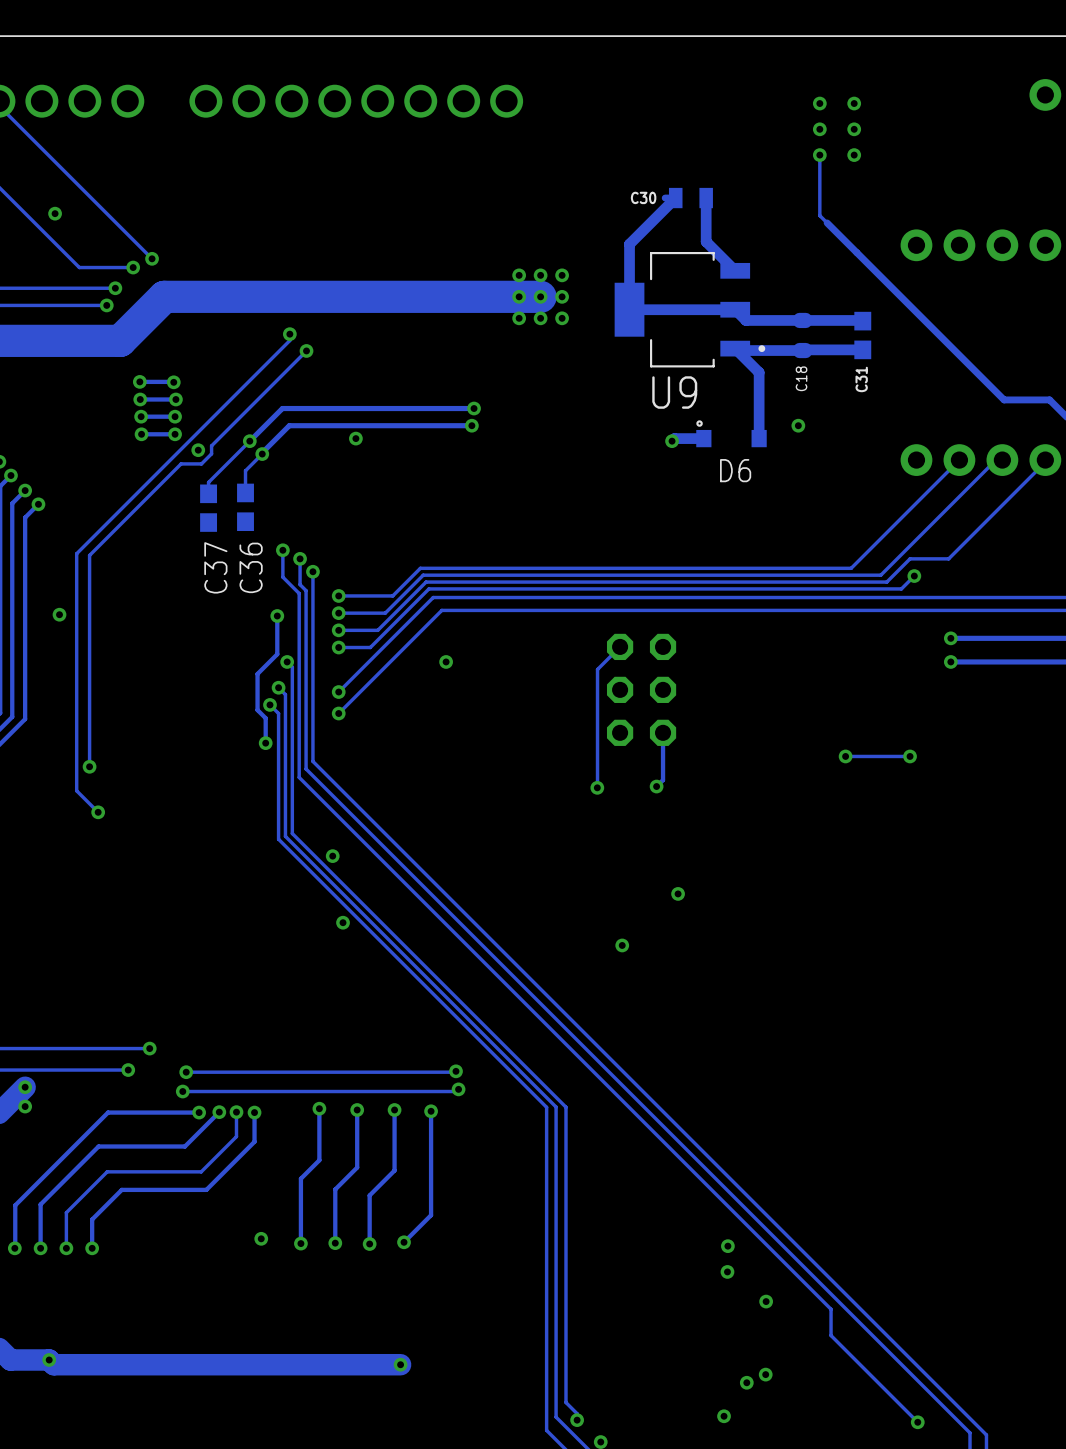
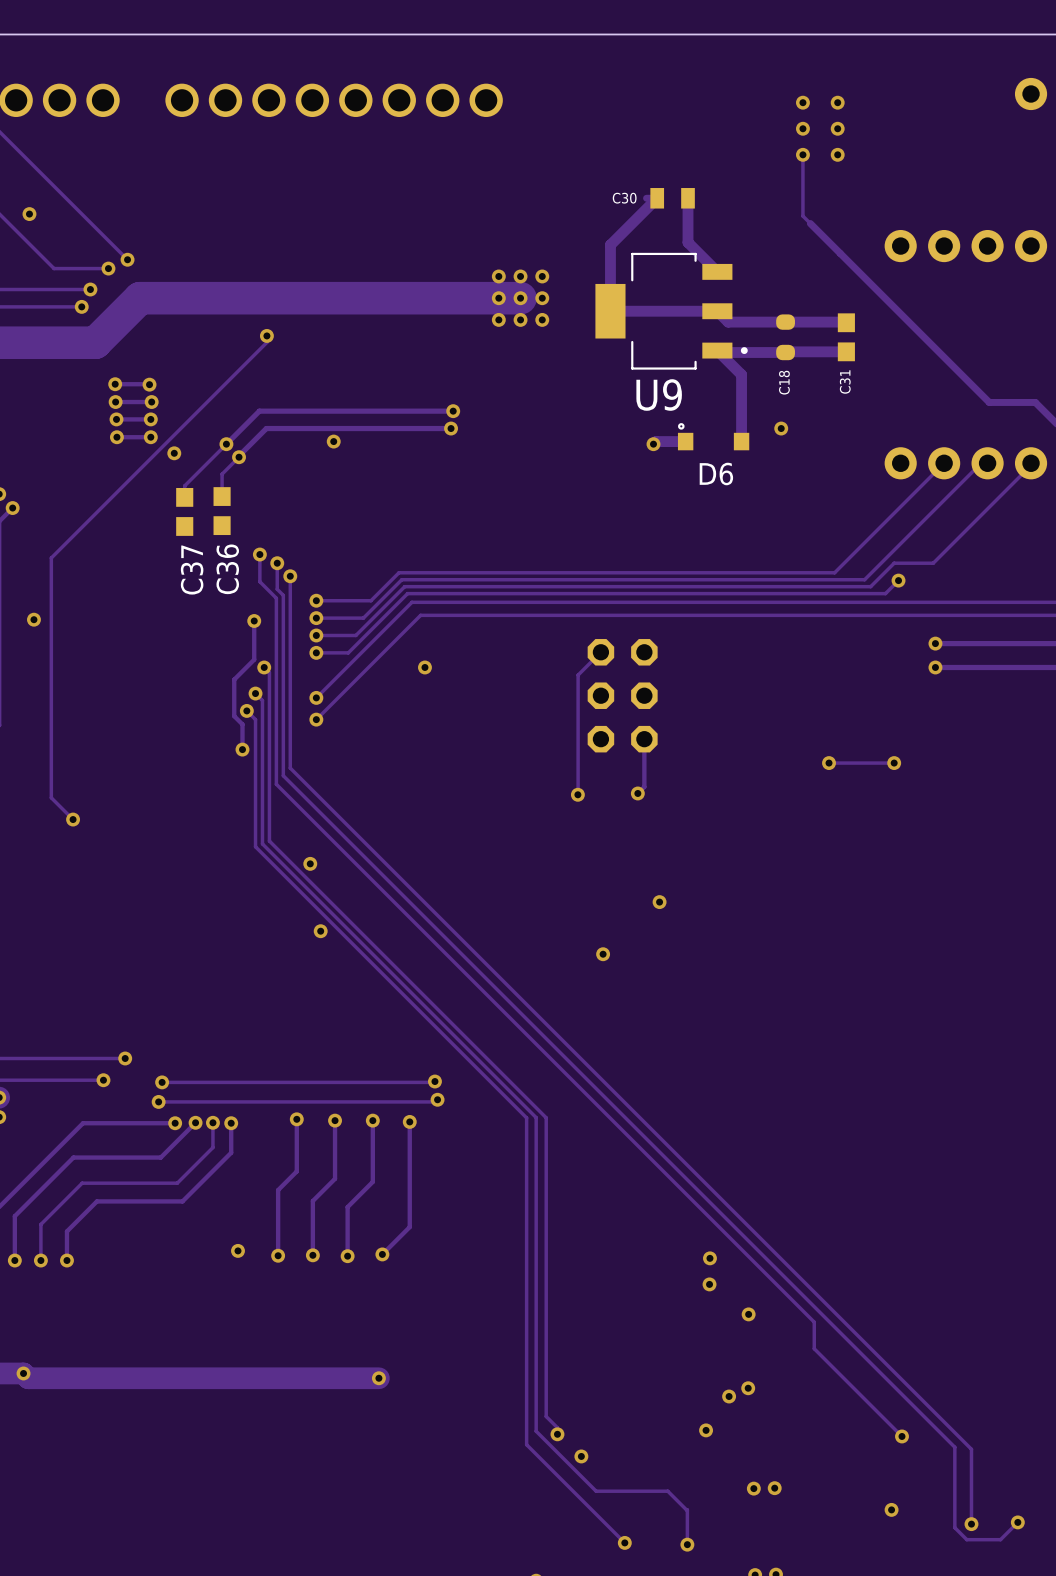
track: (306, 350) (211, 445) (211, 453) (201, 463) (181, 463) (89, 555) (89, 766) -> none
via: (306, 350) -> none
via: (89, 766) -> none

